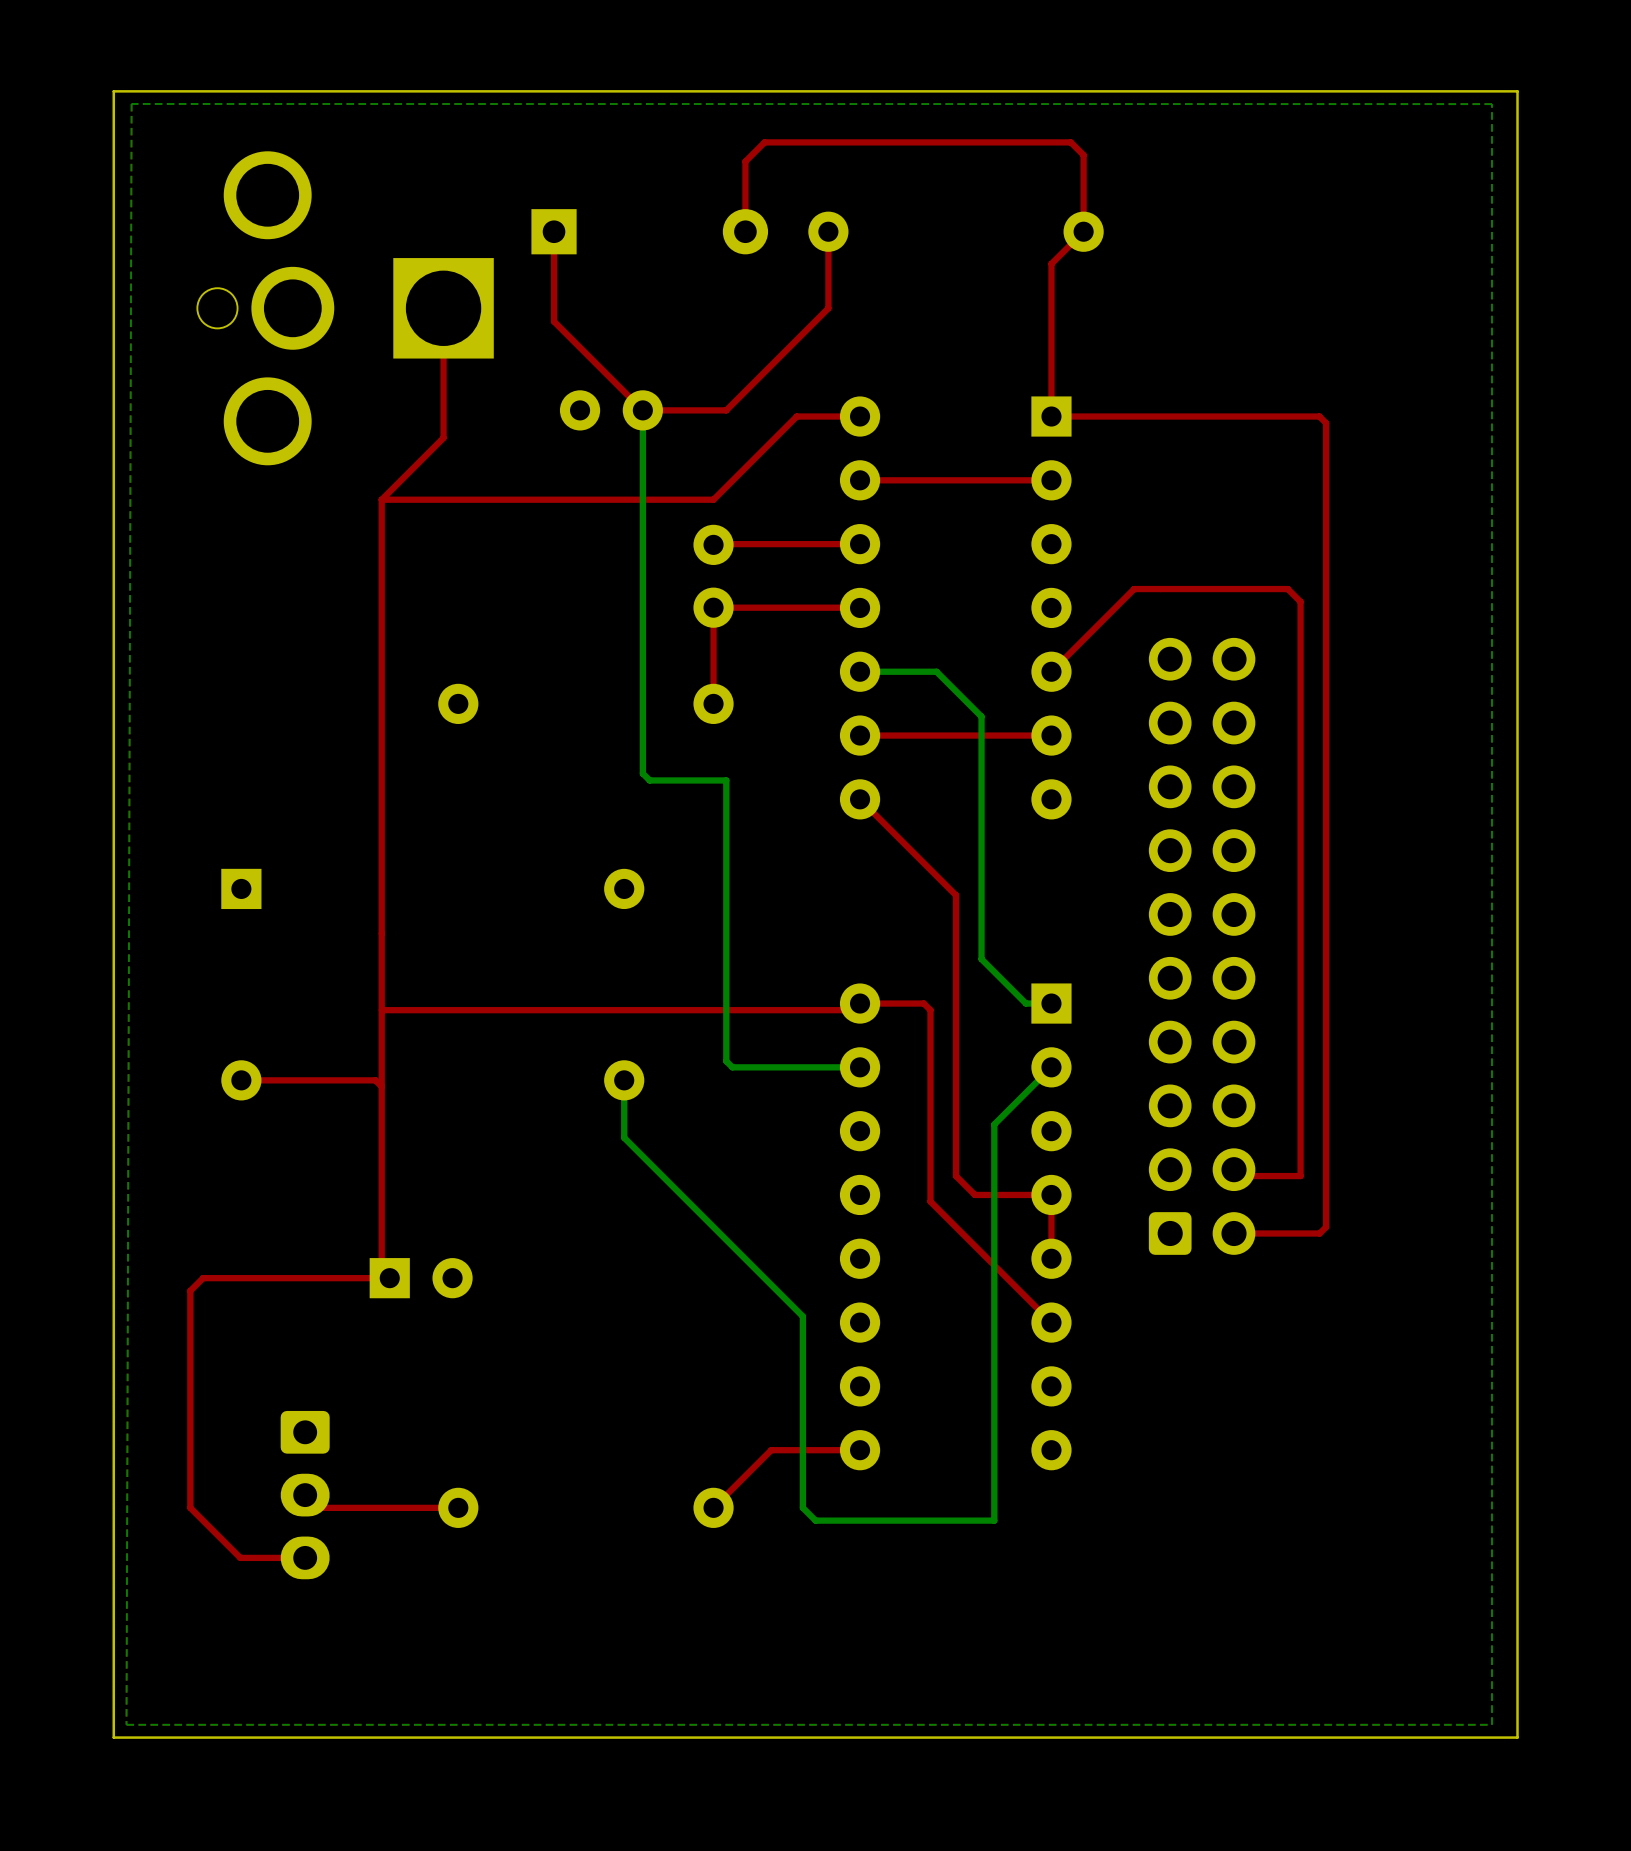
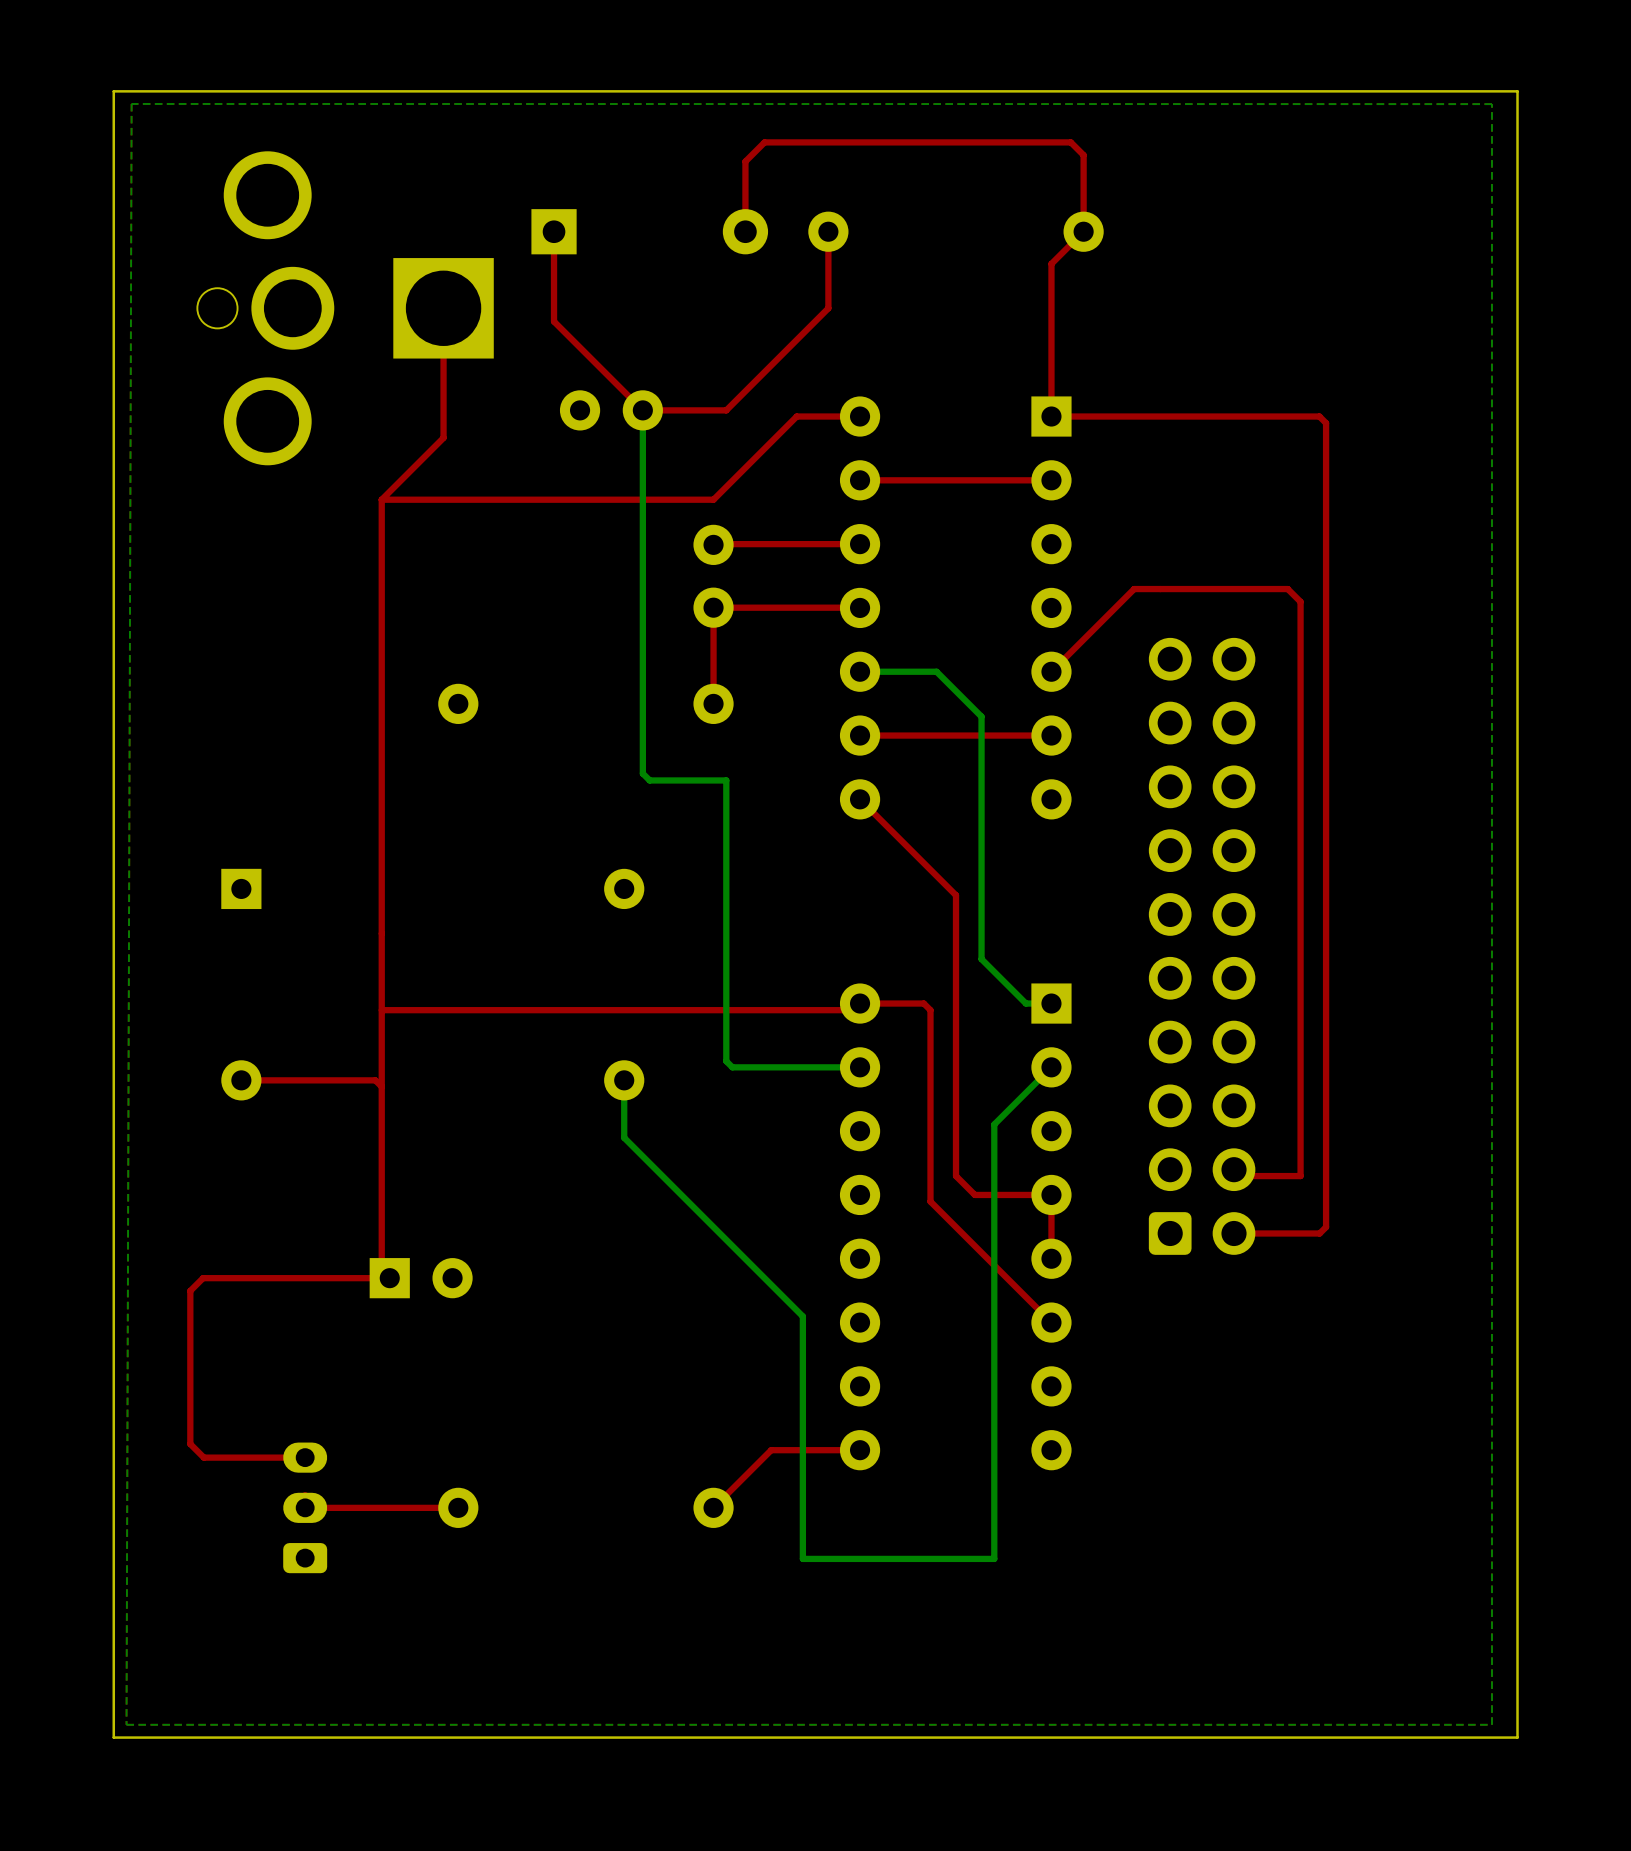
part footprint: [280, 1410, 330, 1580] -> [283, 1442, 328, 1574]
top track: (190, 1444) (190, 1507) (240, 1557) (305, 1557) -> (190, 1444) (203, 1457) (305, 1457)
bottom track: (802, 1507) (815, 1520) (994, 1520) -> (802, 1507) (802, 1558) (994, 1558) (994, 1520)

